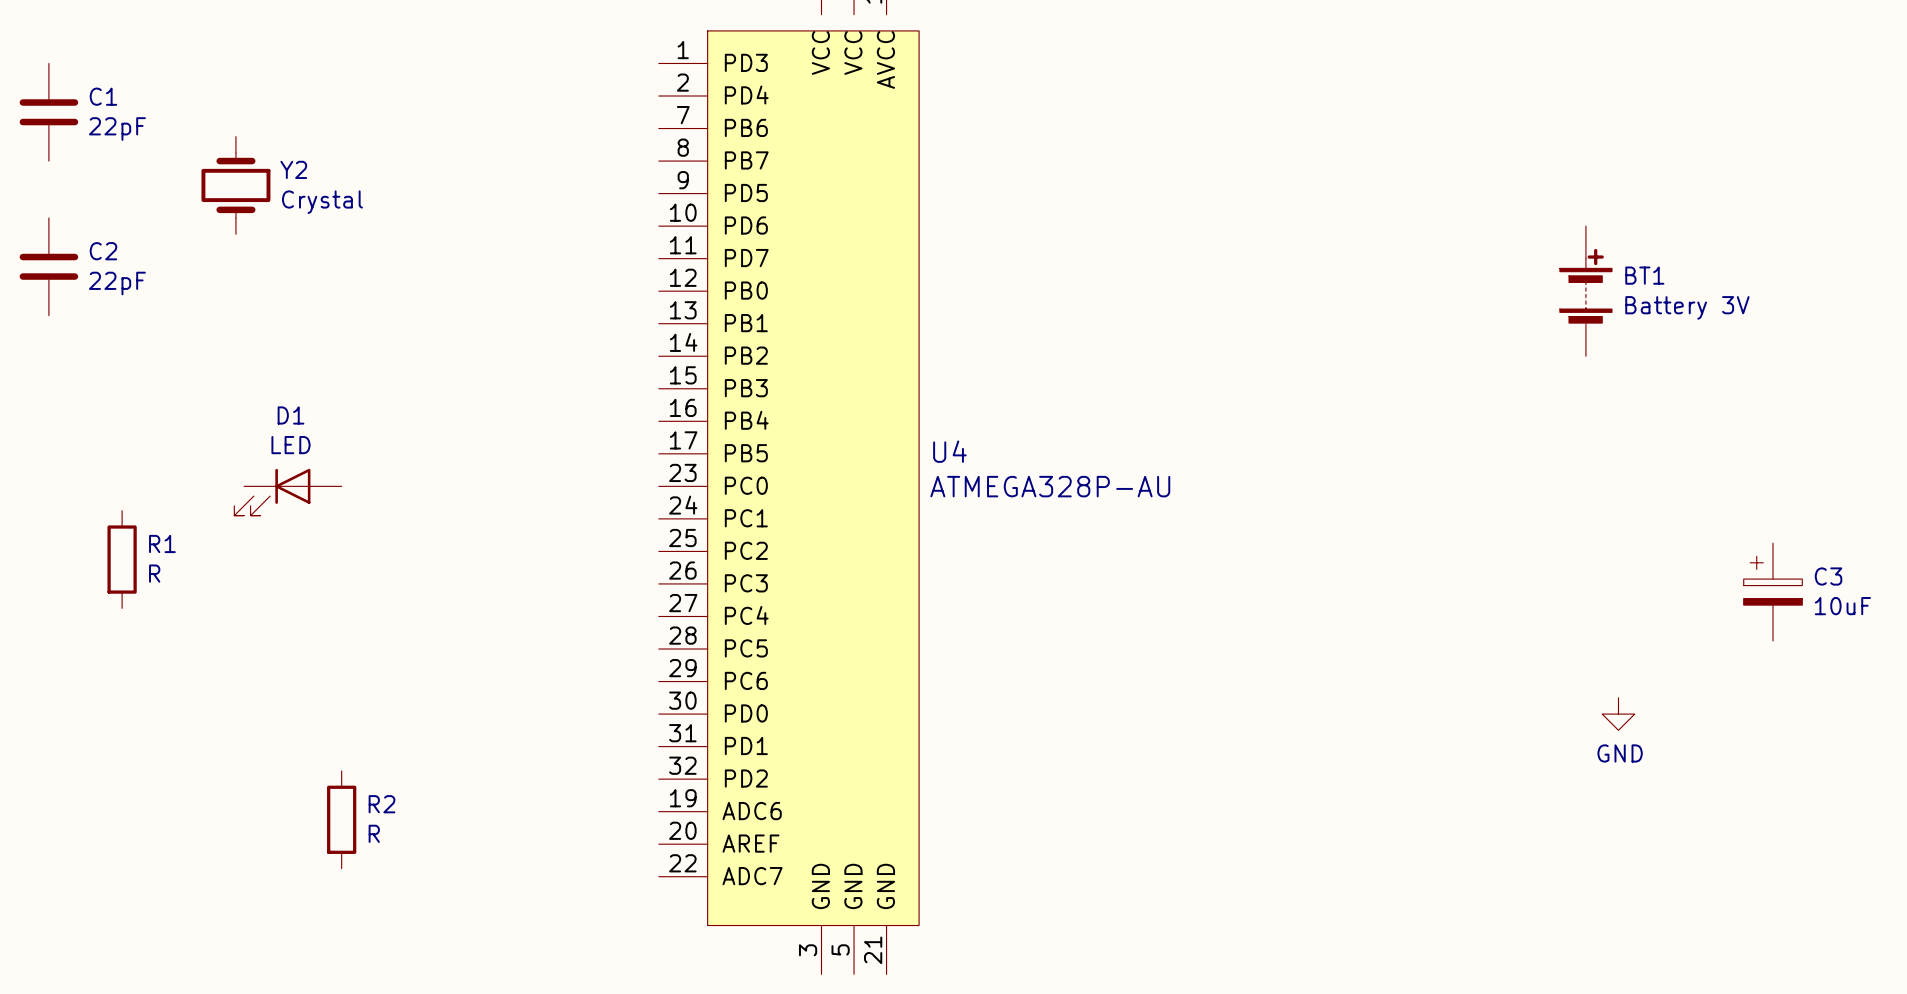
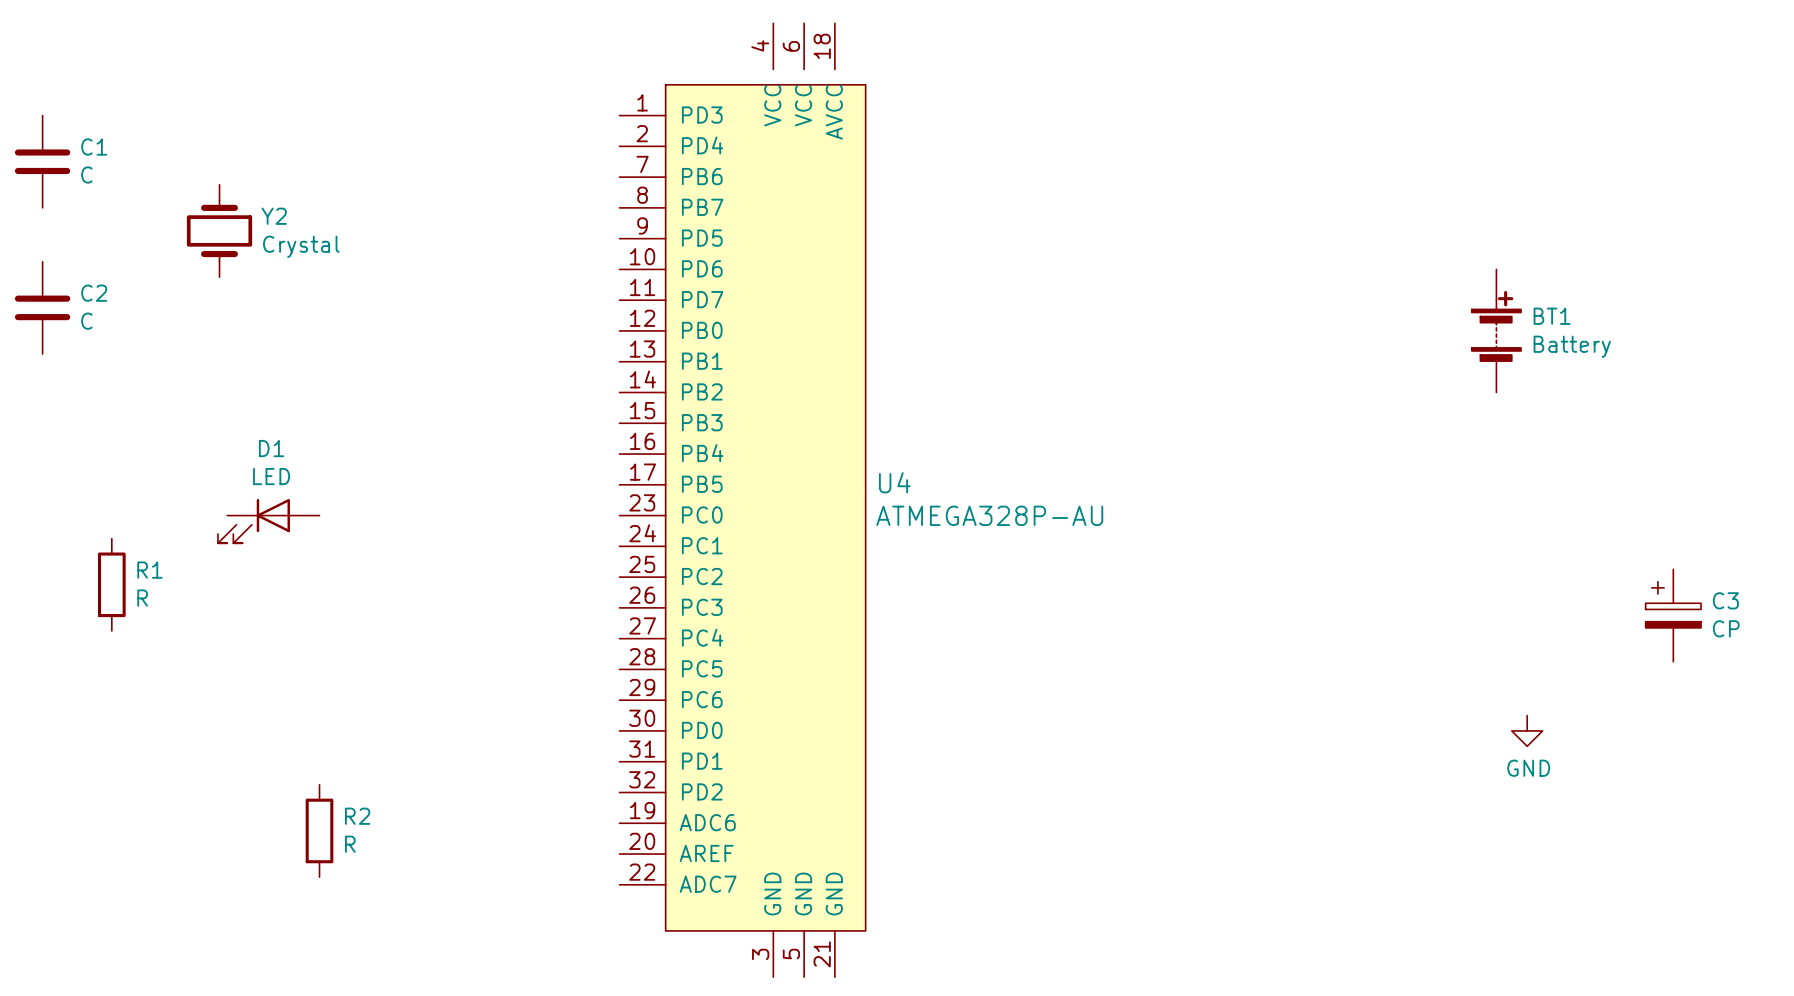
C1 value: 22pF (117, 129) -> C (86, 175)
C2 value: 22pF (117, 283) -> C (86, 321)
BT1 value: Battery 3V (1687, 307) -> Battery (1572, 346)
C3 value: 10uF (1842, 606) -> CP (1726, 628)

